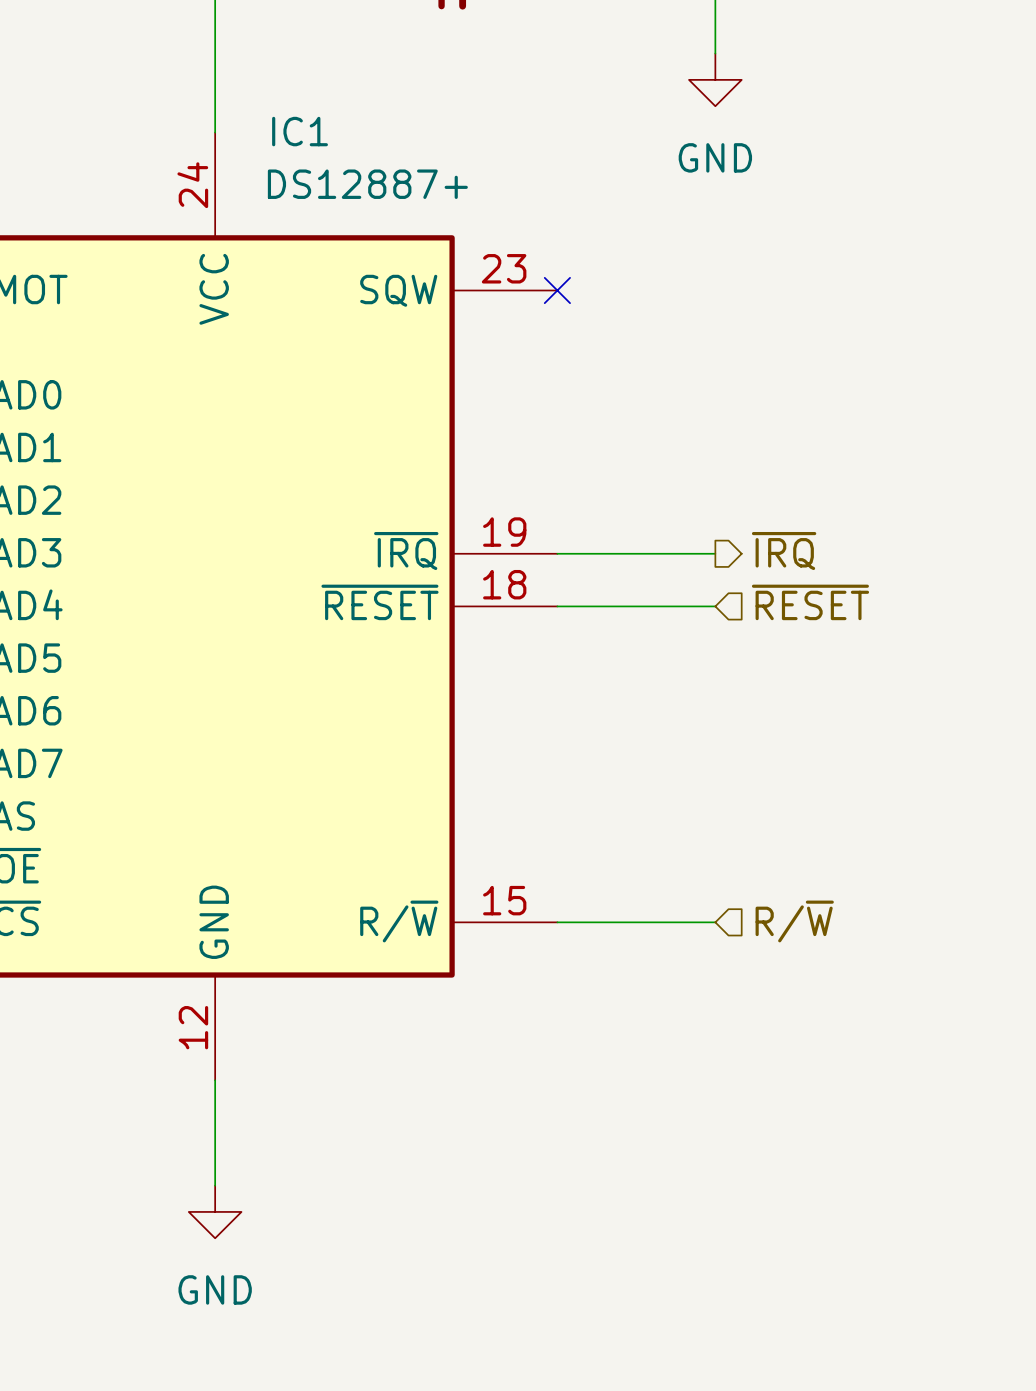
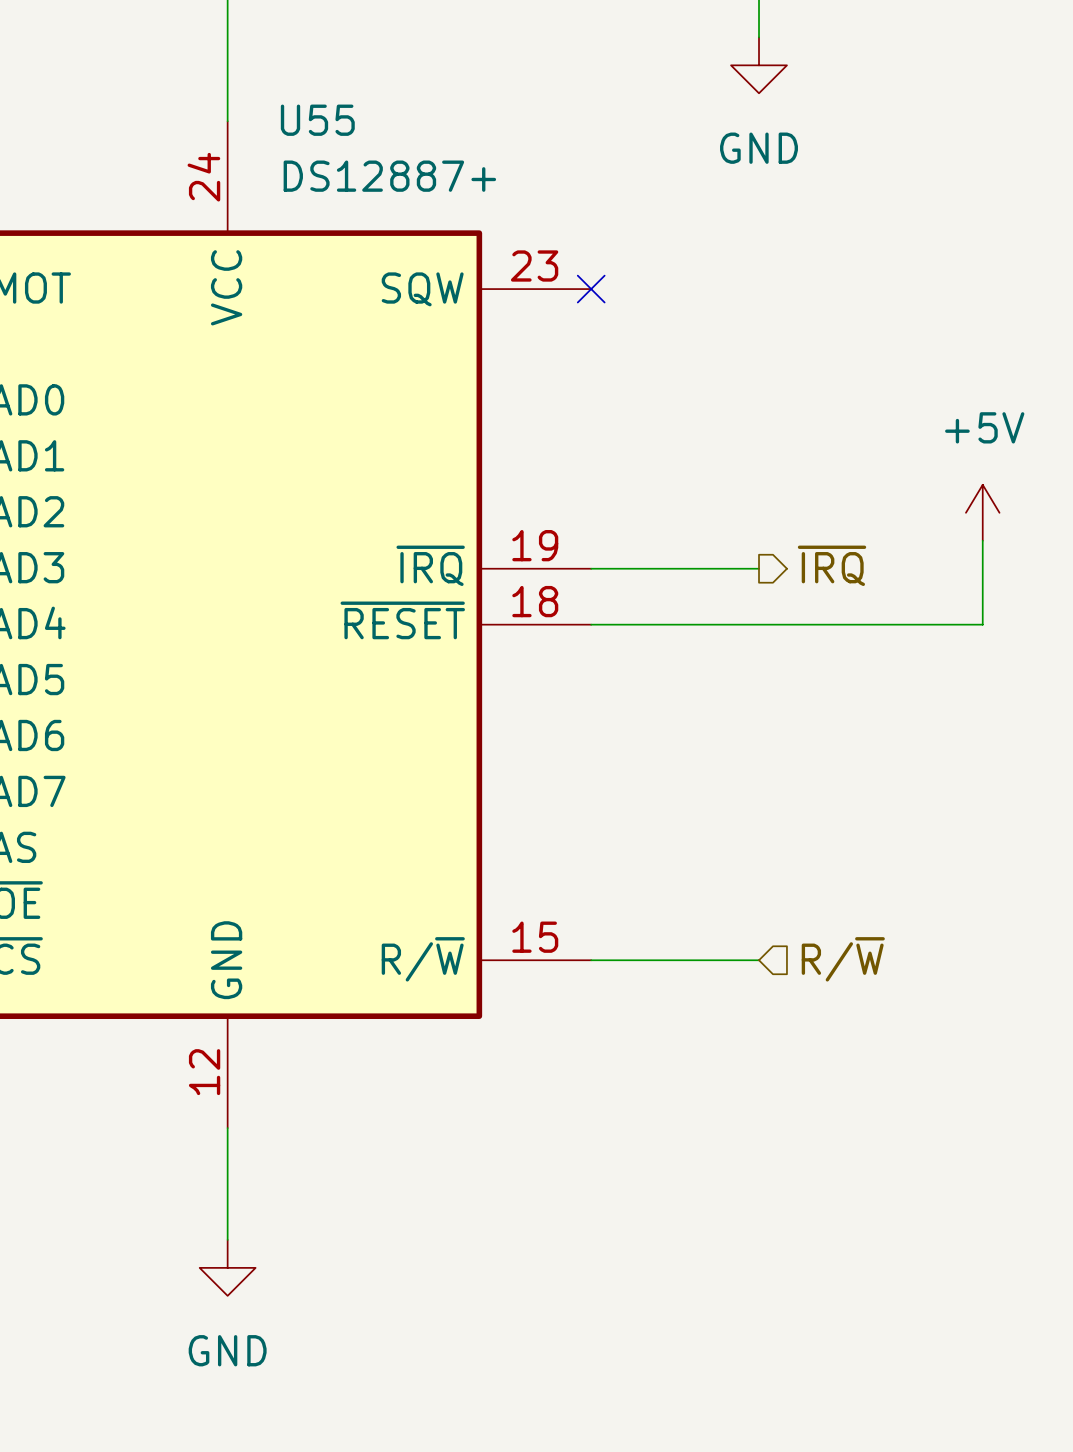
IC1 name: IC1 (300, 131) -> U55 (317, 120)
power symbol: none -> +5V (982, 512)
wire: none -> (982, 540) (982, 624) (759, 624)
hierarchical label: ~{RESET} (810, 602) -> none

